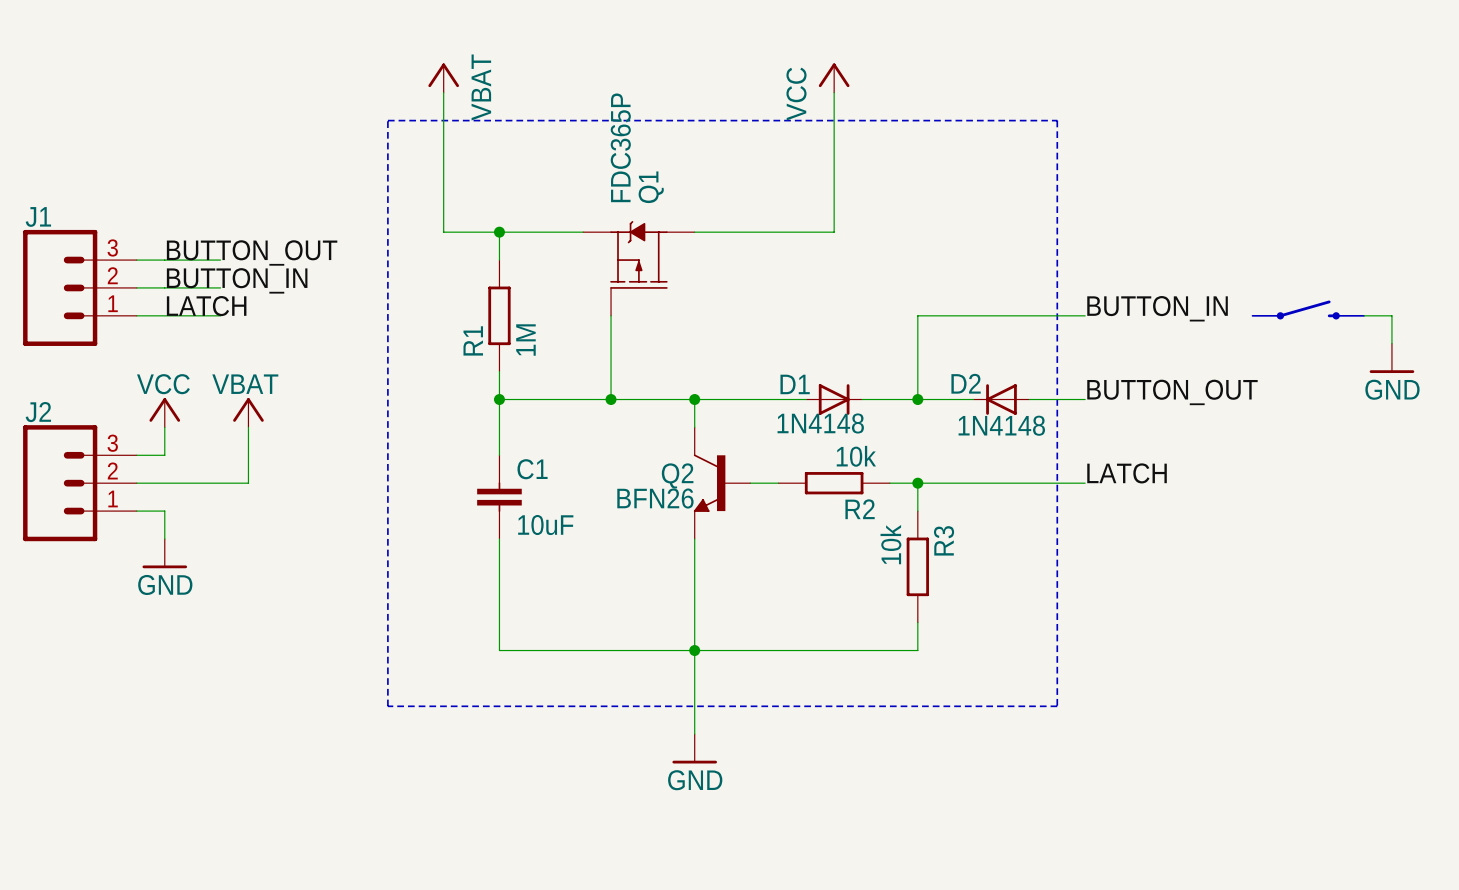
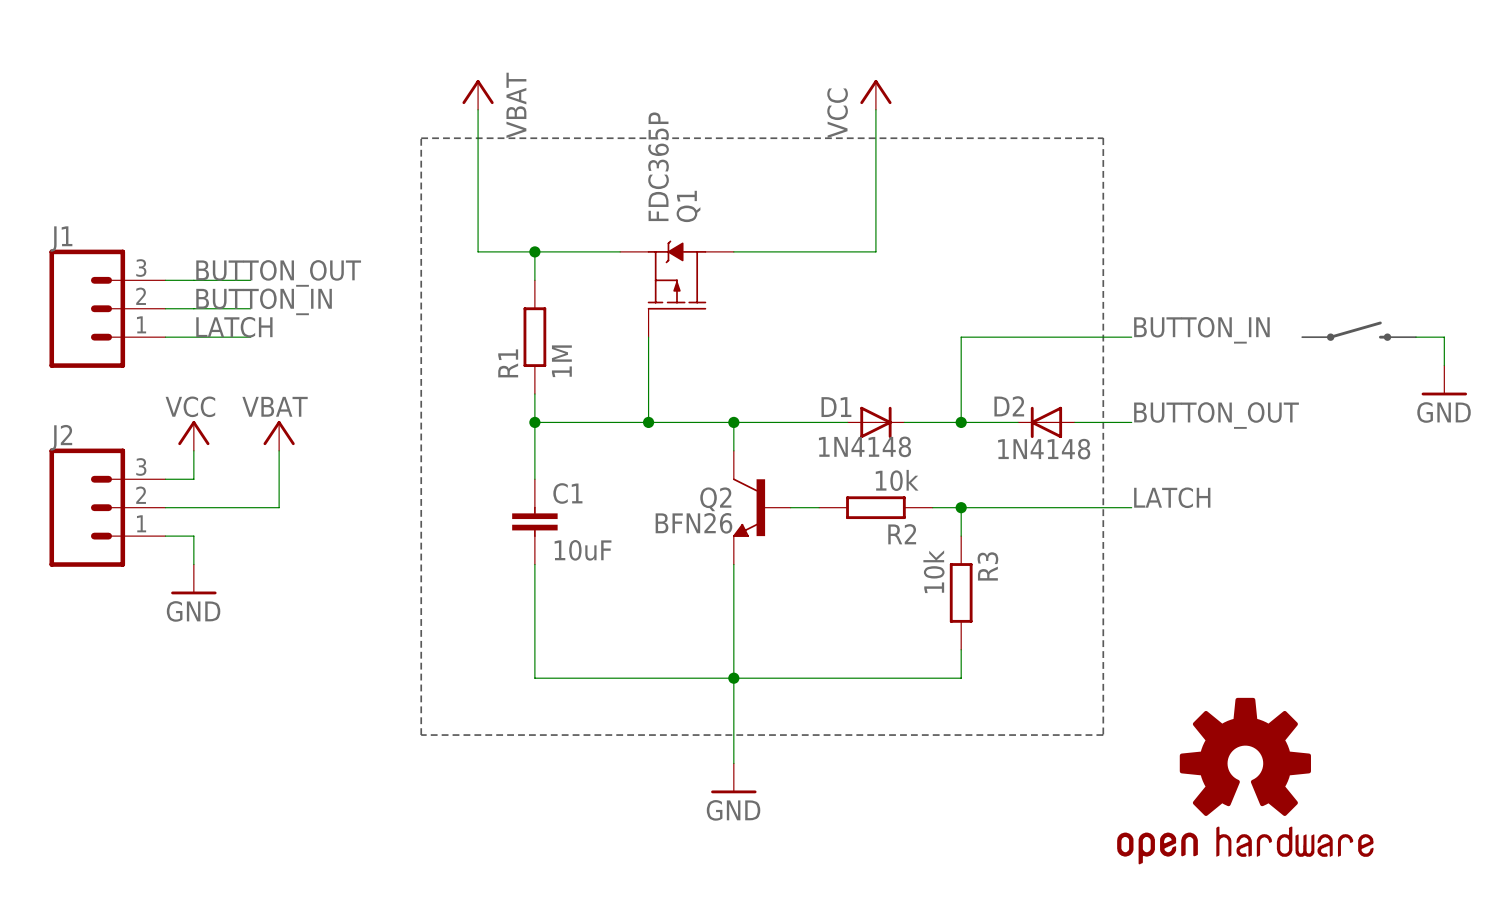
part: none -> (1245, 781)

